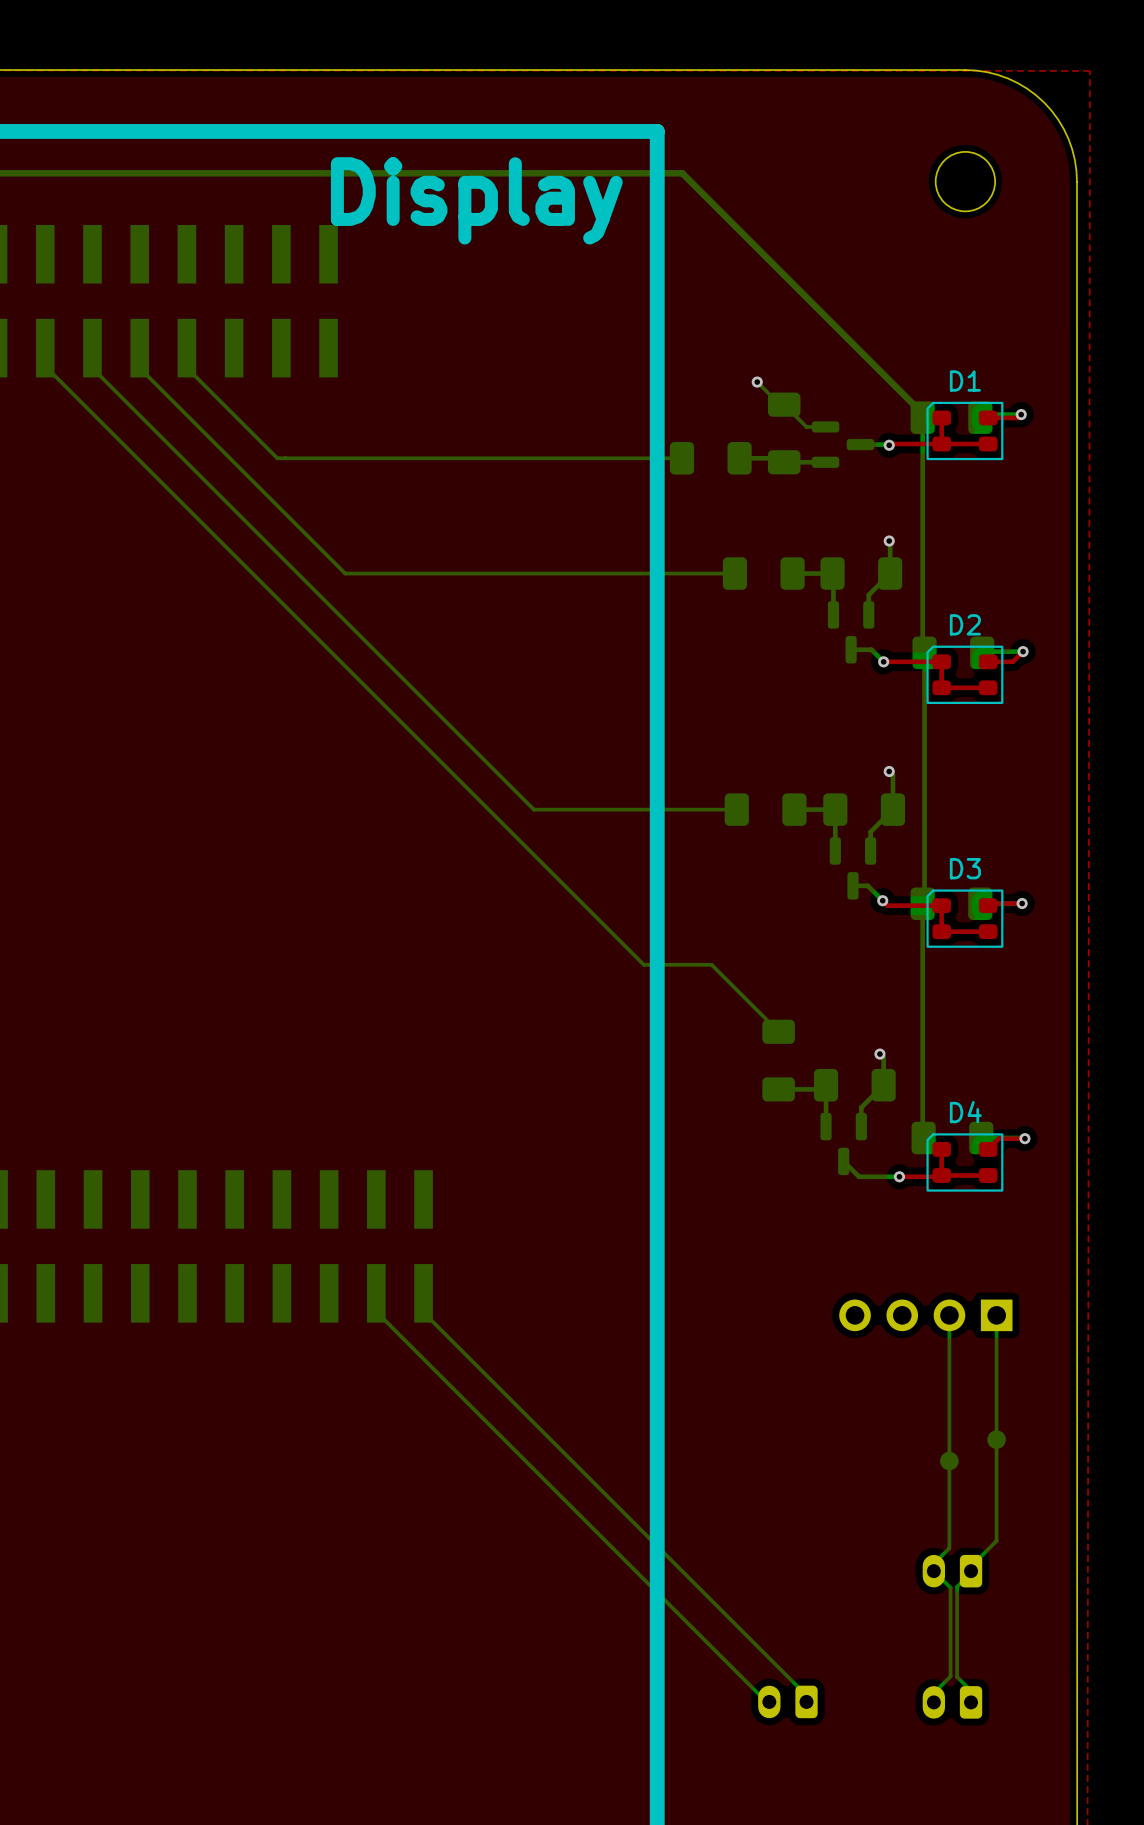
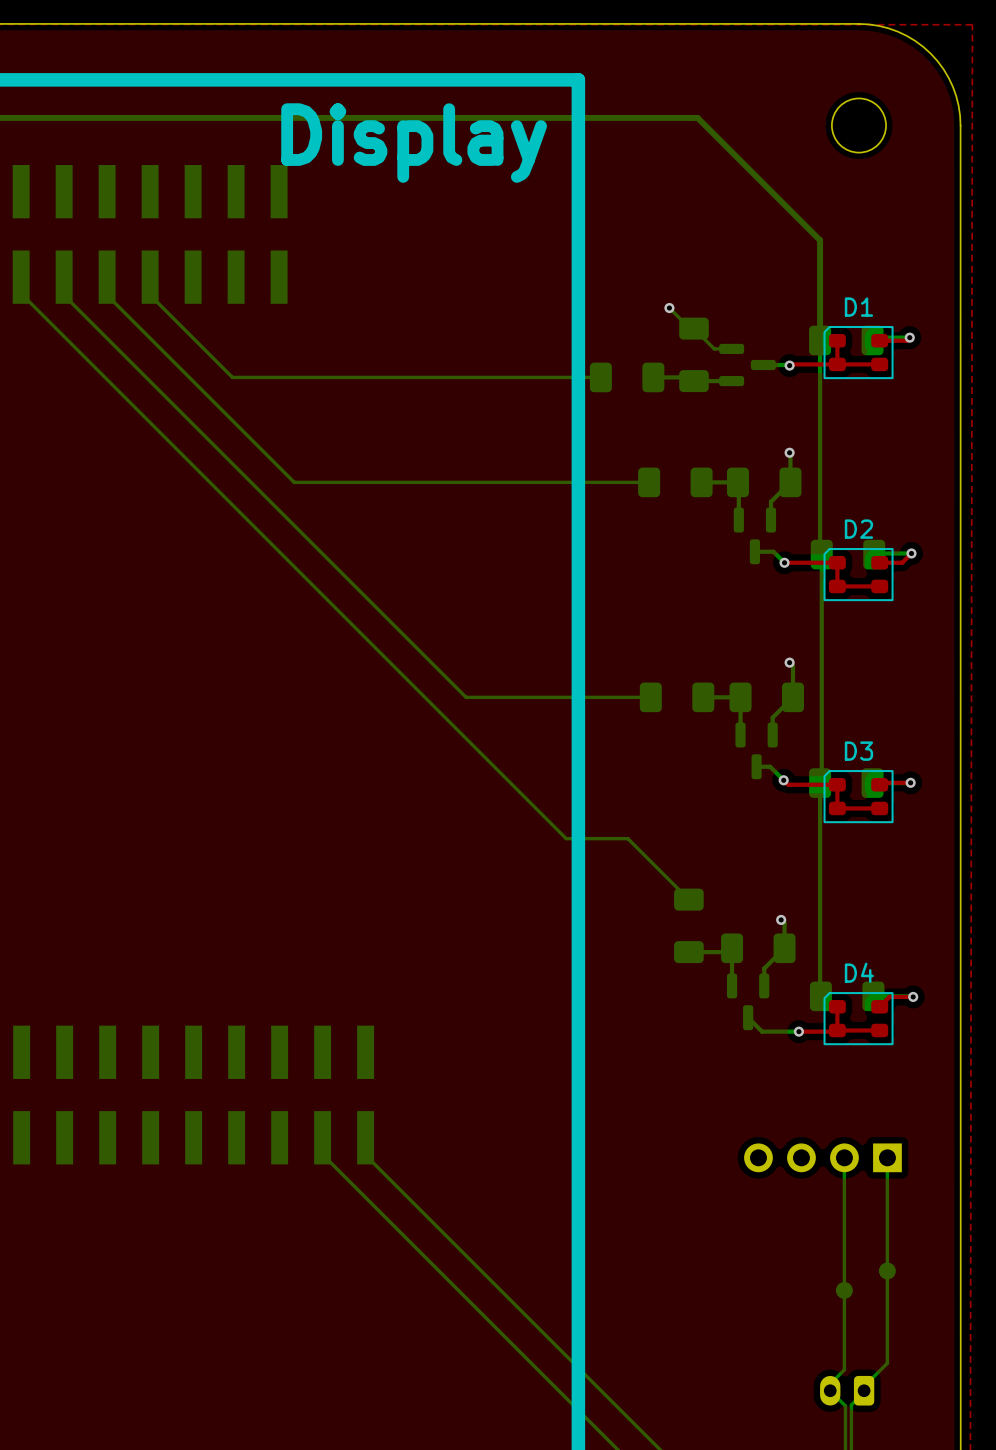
bottom track: (682, 173) (922, 413) -> (601, 117) (697, 117) (820, 240) (820, 336)

